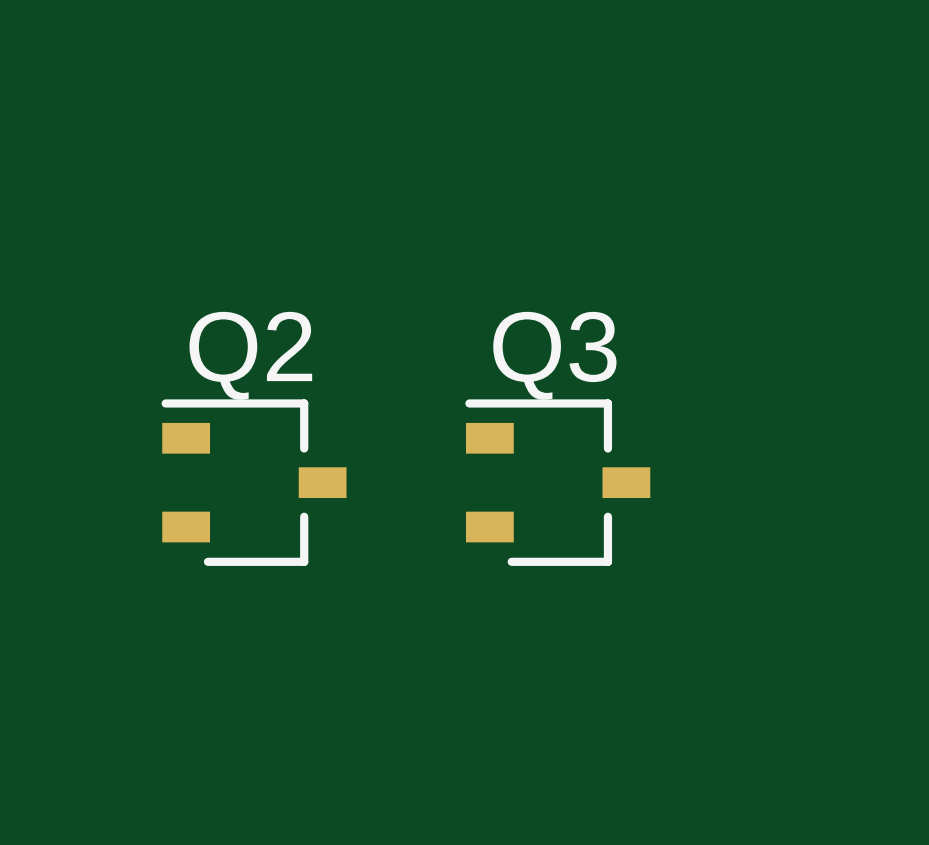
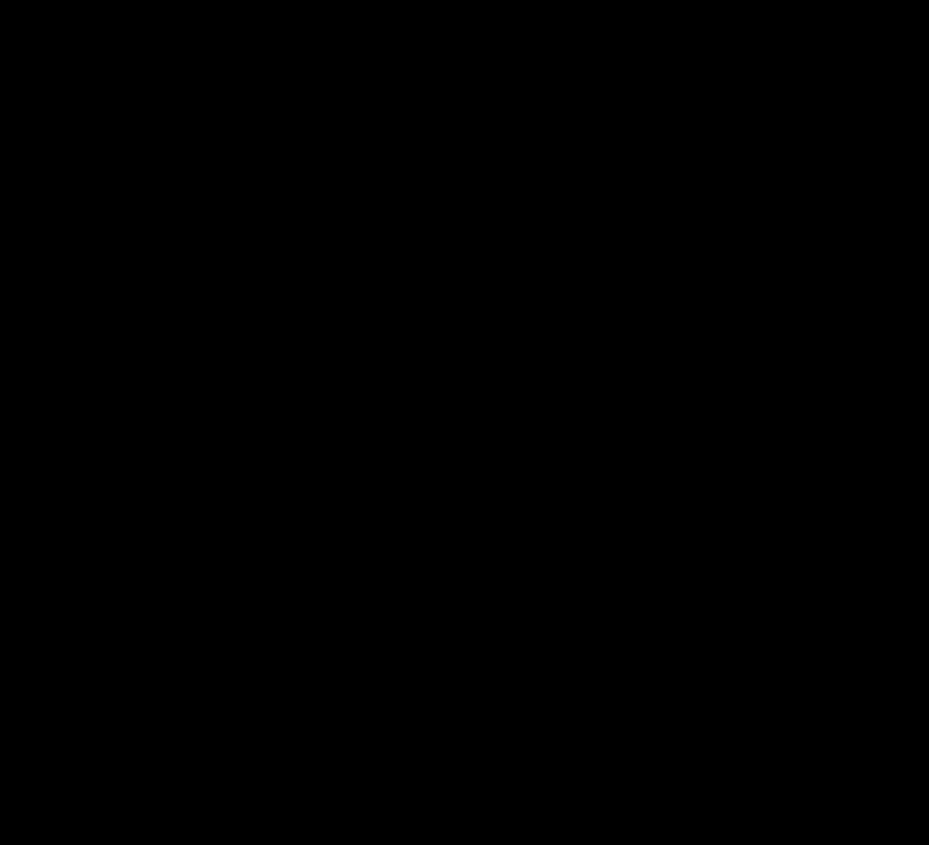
Q2: (254, 482) -> none
Q3: (557, 482) -> none

